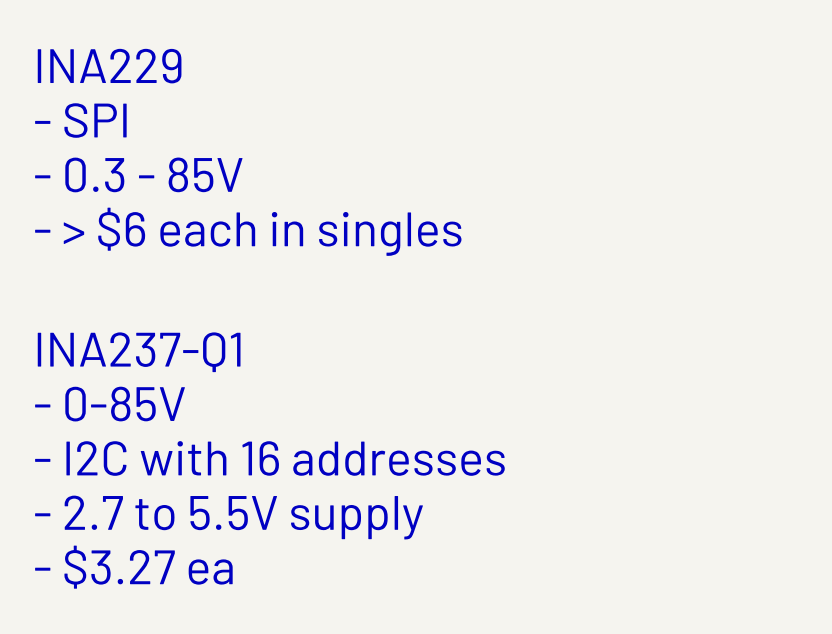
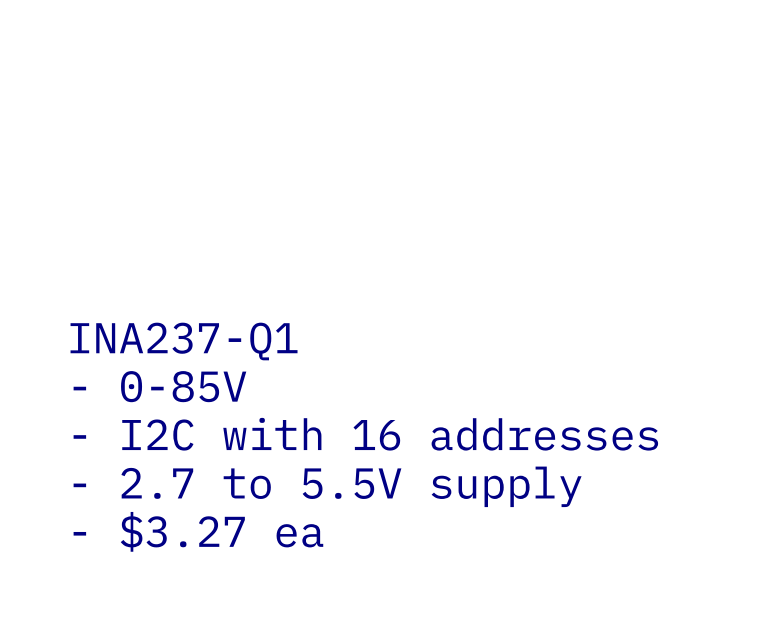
text: INA229 (109, 66) -> none
text: - SPI (80, 120) -> none
text: - 0.3 - 85V (138, 174) -> none
text: - > $6 each in singles (248, 231) -> none

